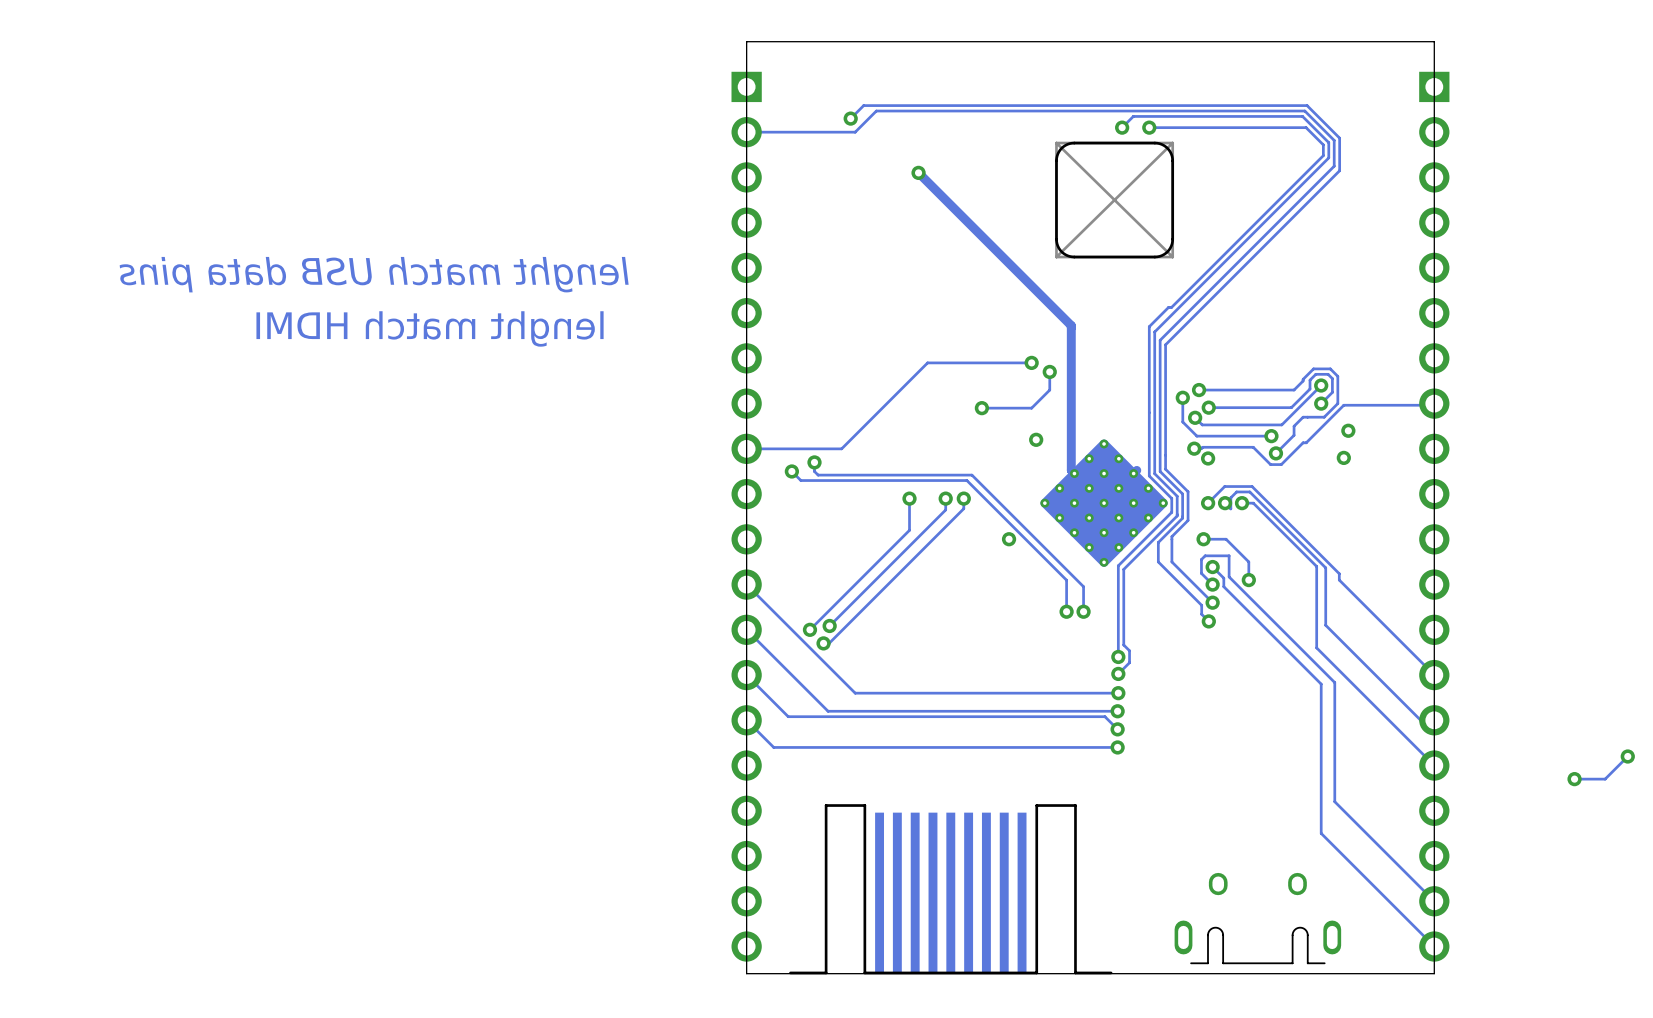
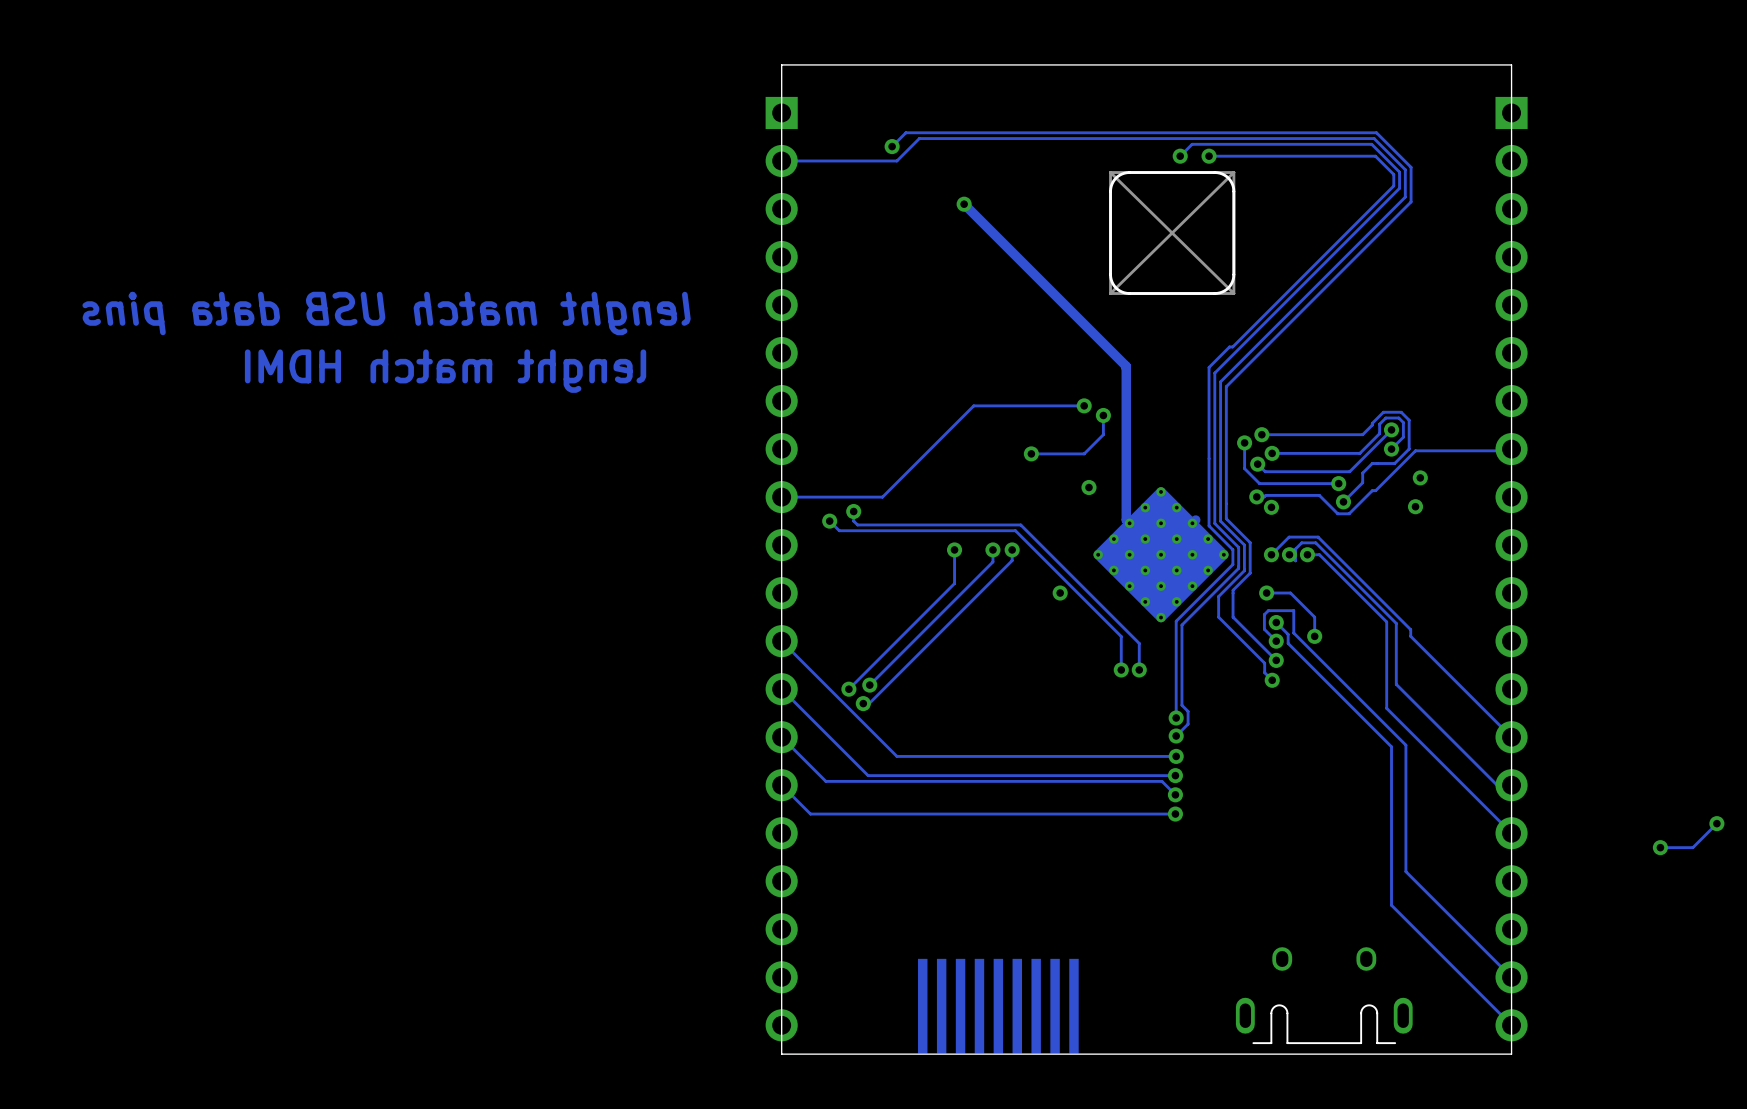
part: (950, 889) -> none
part: none -> (998, 1006)

